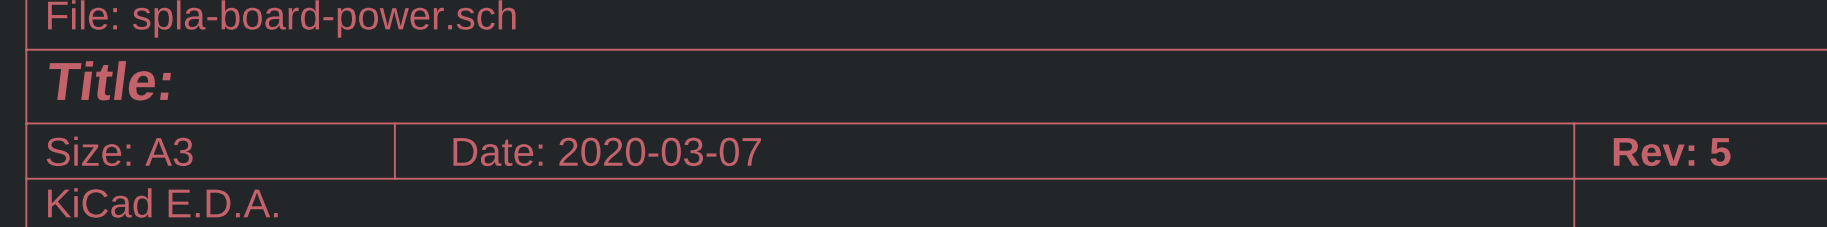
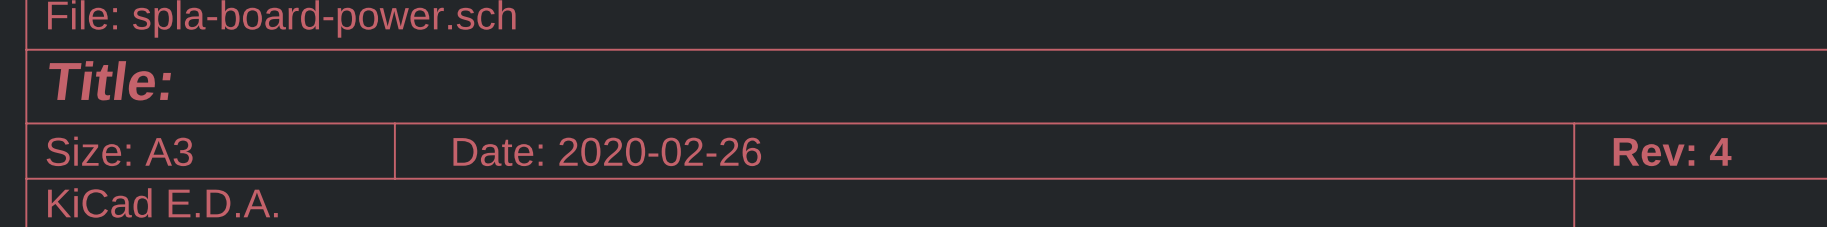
title block: Date: 2020-03-07 (607, 151) -> Date: 2020-02-26 (607, 151)
title block: Rev: 5 (1672, 152) -> Rev: 4 (1672, 152)

